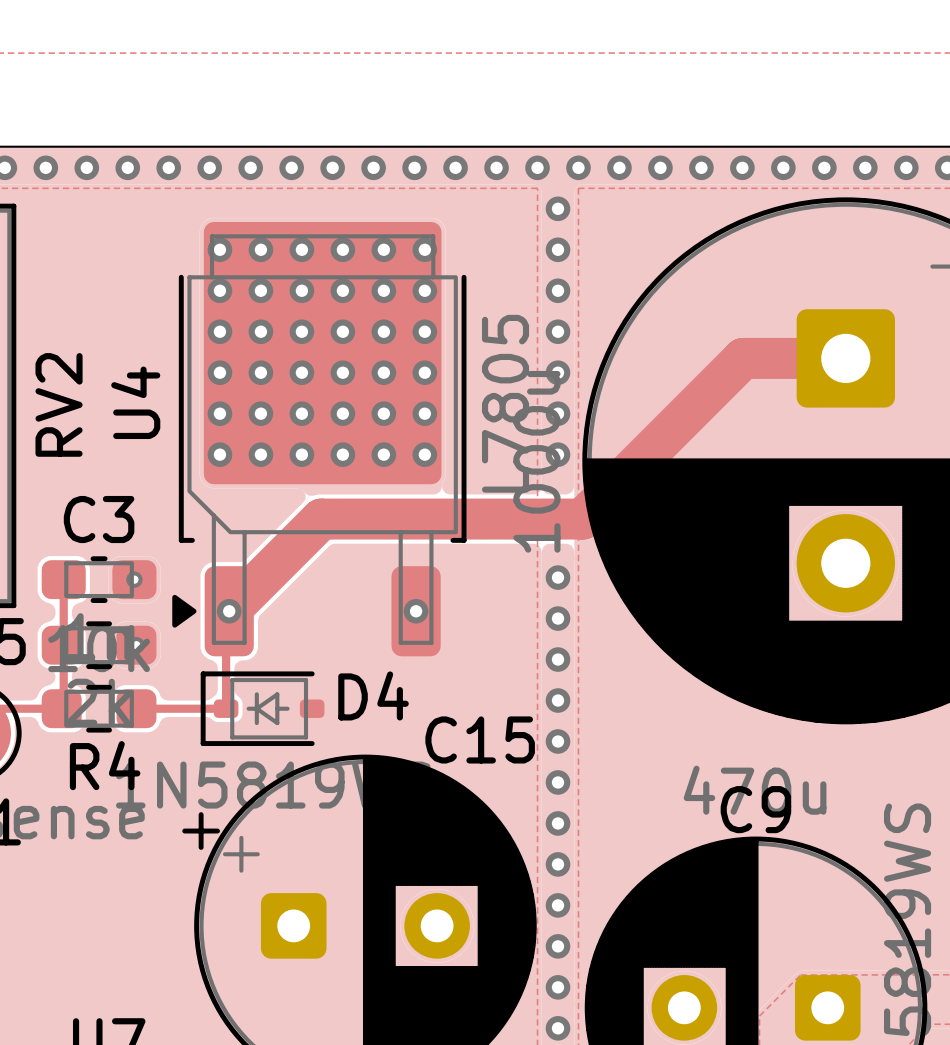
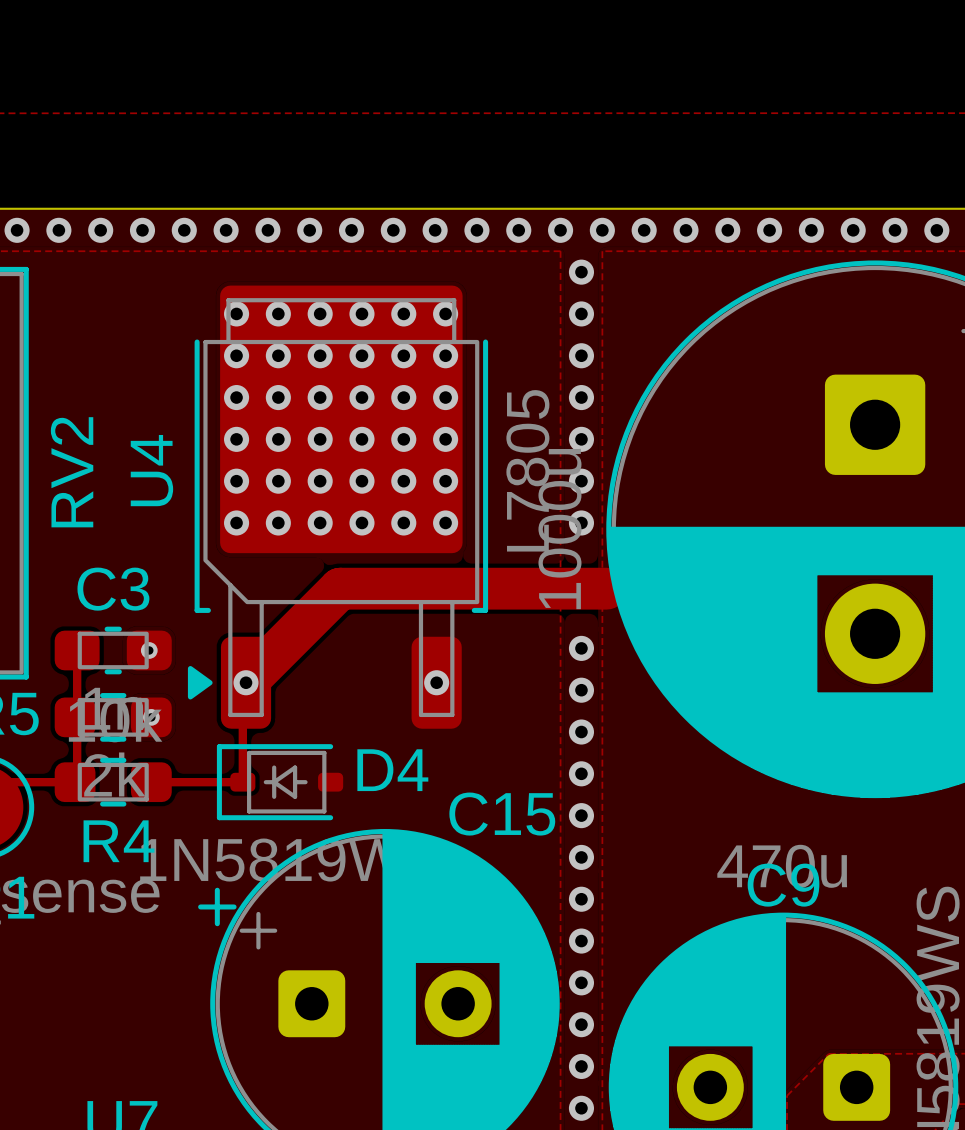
track: (845, 358) (743, 358) (582, 519) -> none

